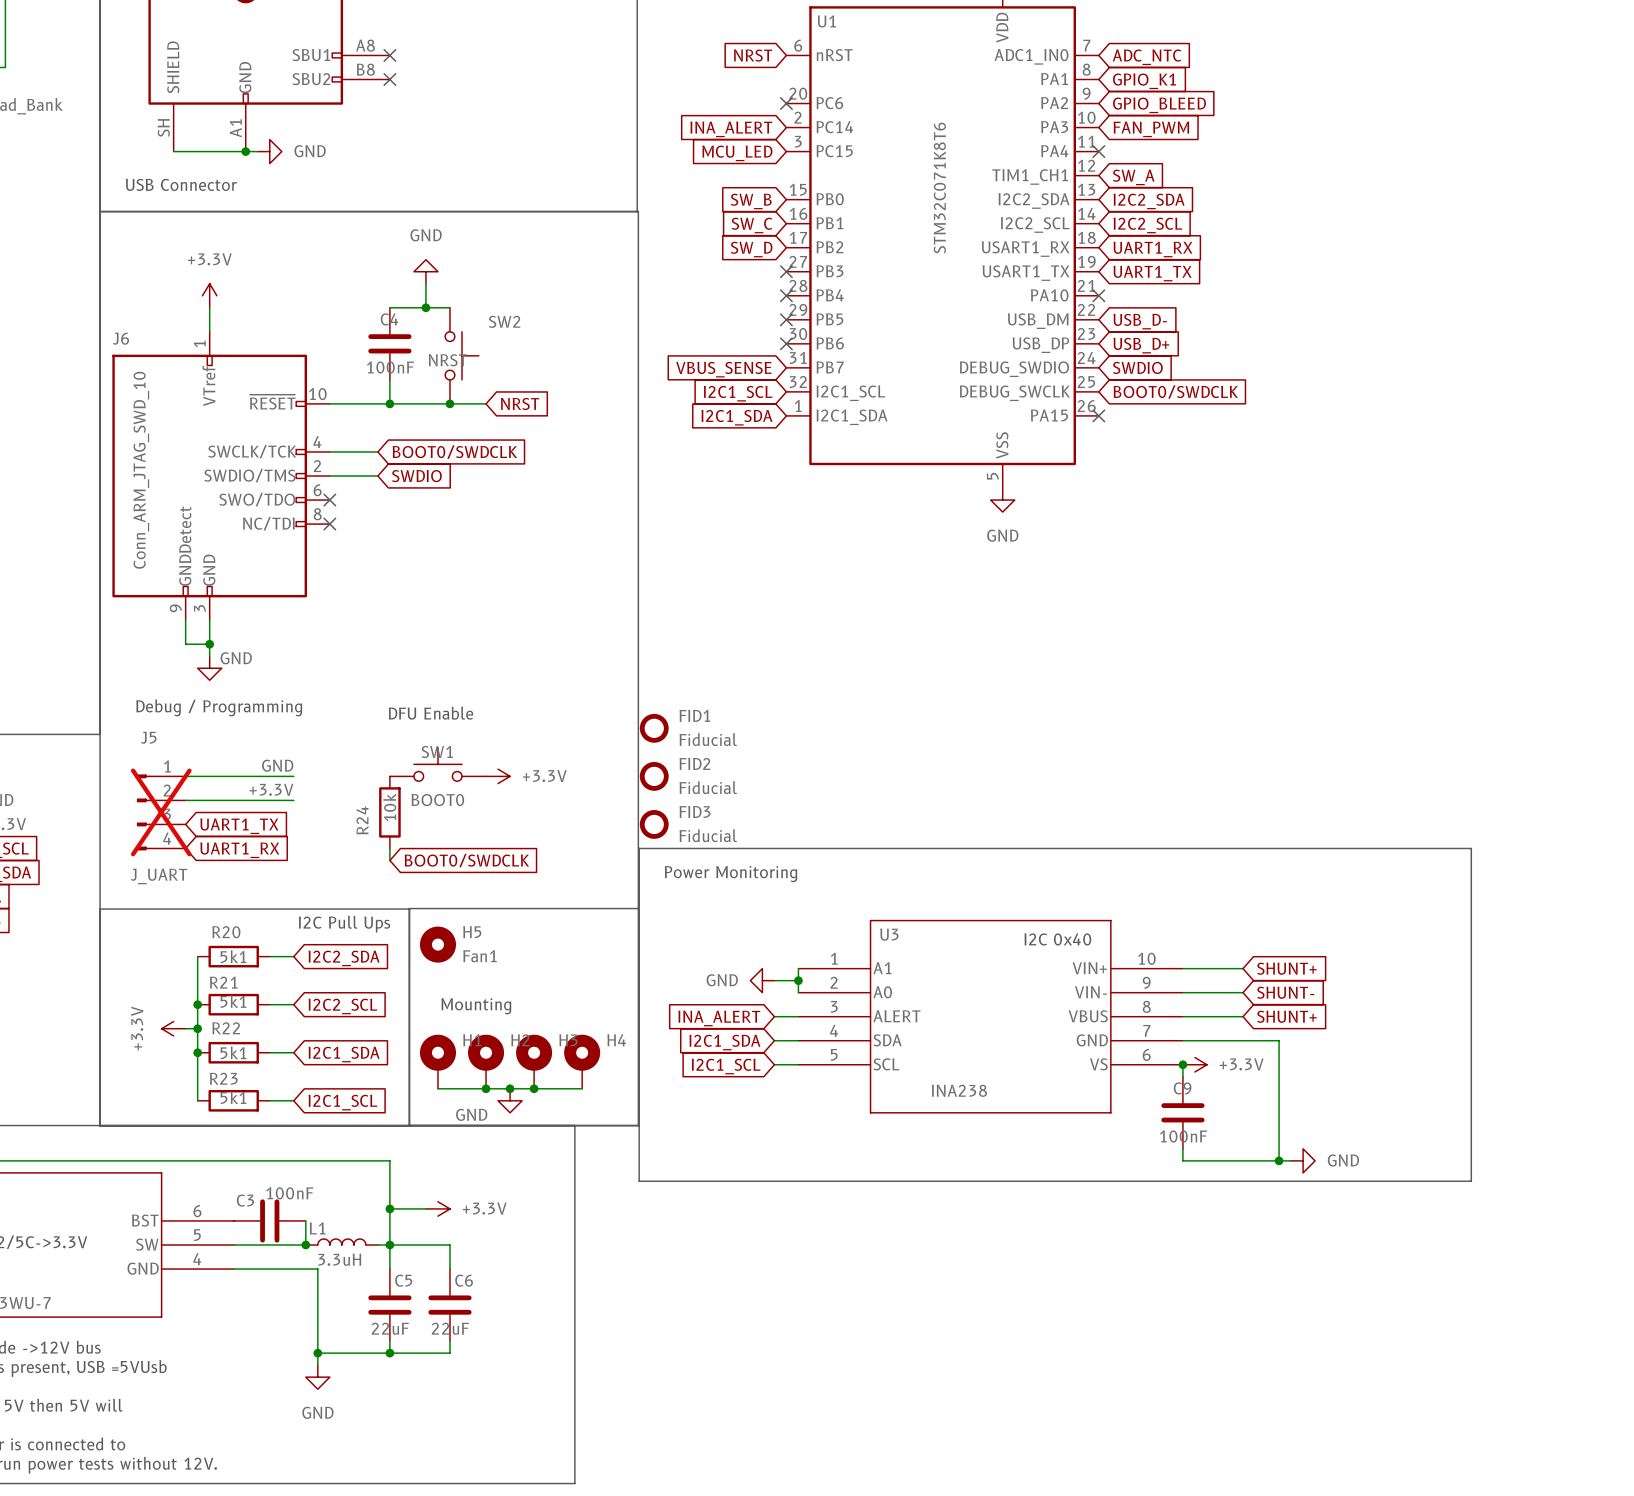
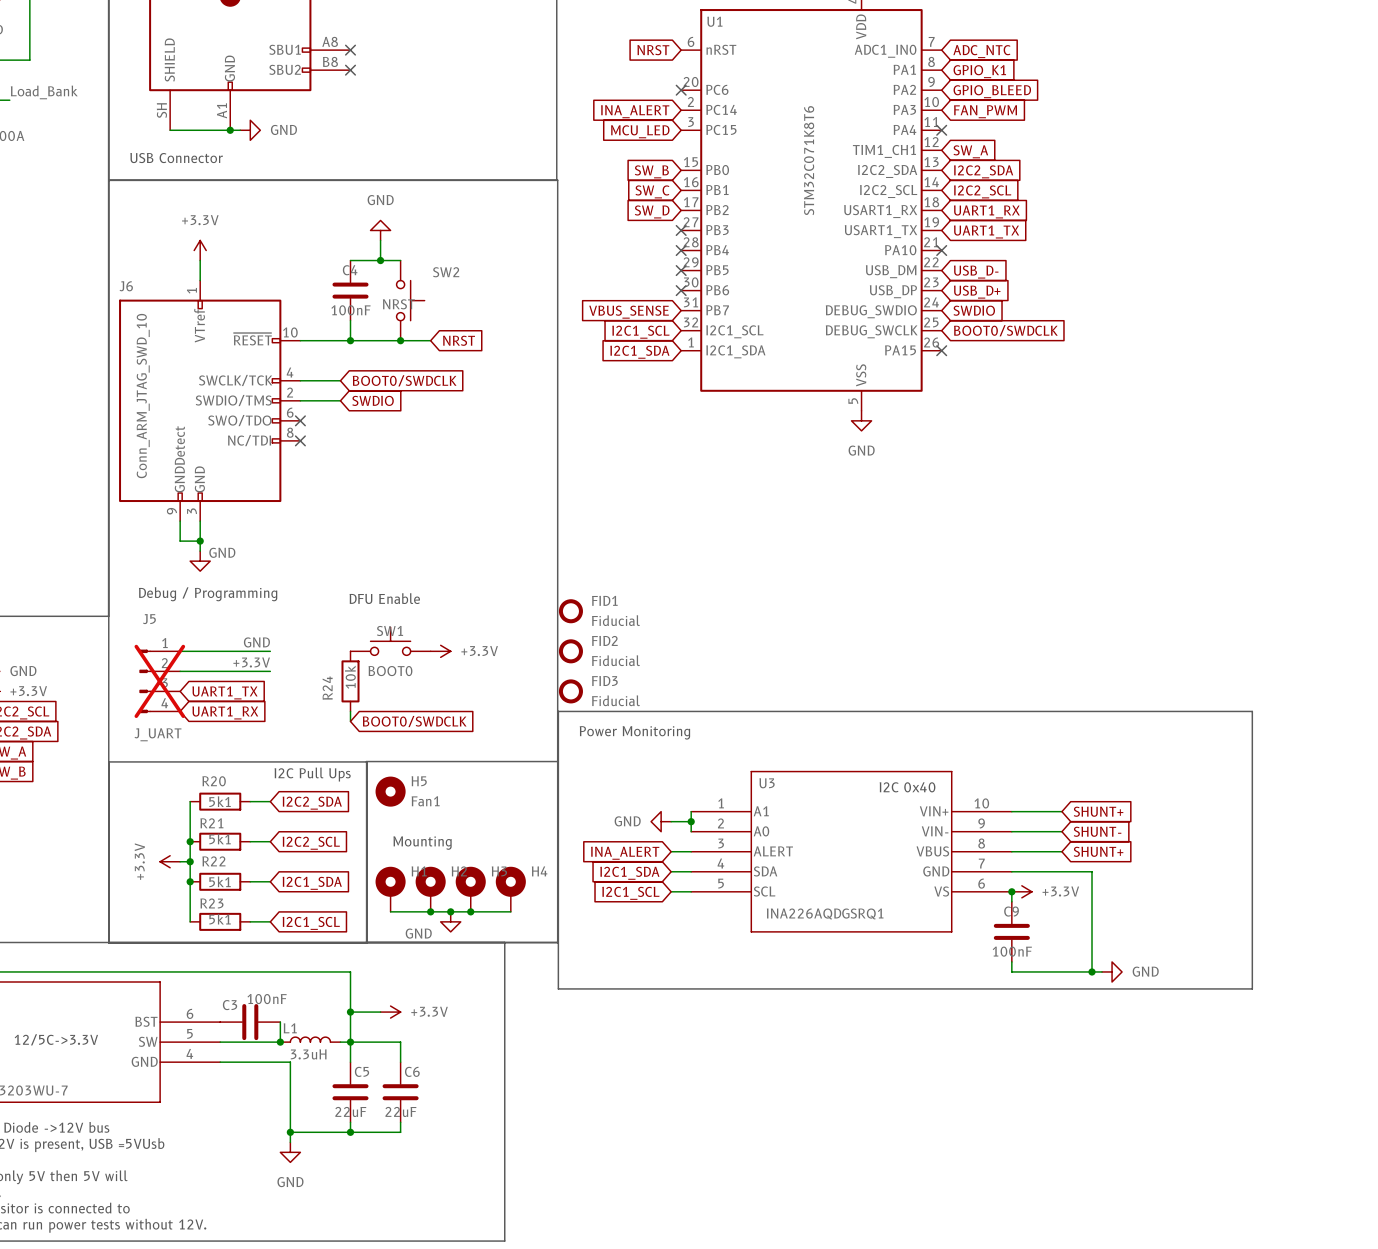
U3 value: INA238 (959, 1090) -> INA226AQDGSRQ1 (825, 913)

